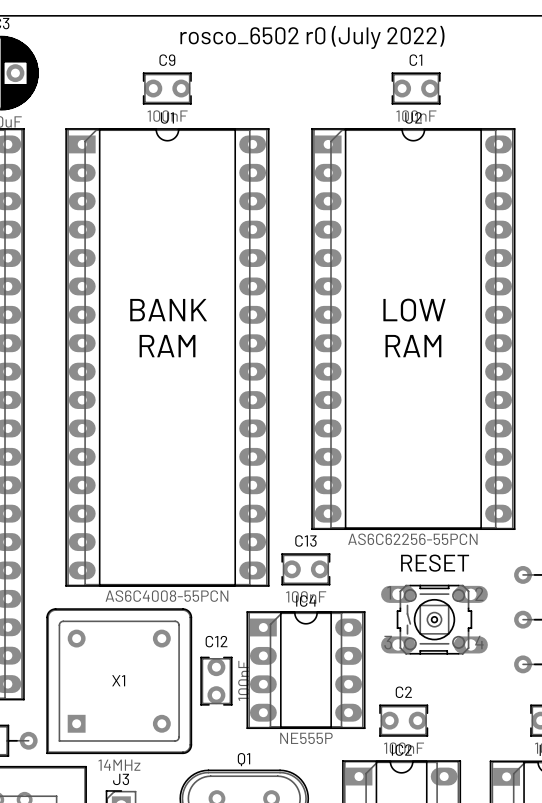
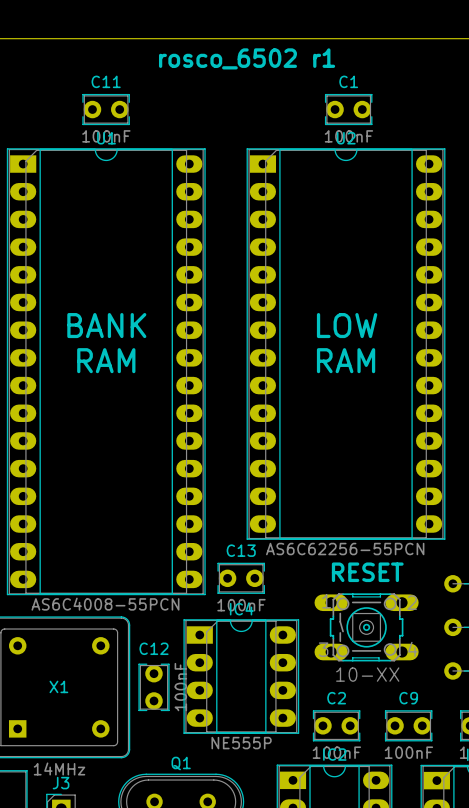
text: rosco_6502 r0 (July 2022) (312, 37) -> rosco_6502 r1 (247, 58)
C9 name: C9 (167, 60) -> C11 (106, 81)
part value: none -> 10-XX (367, 674)
C9: none -> 100nF (408, 725)

